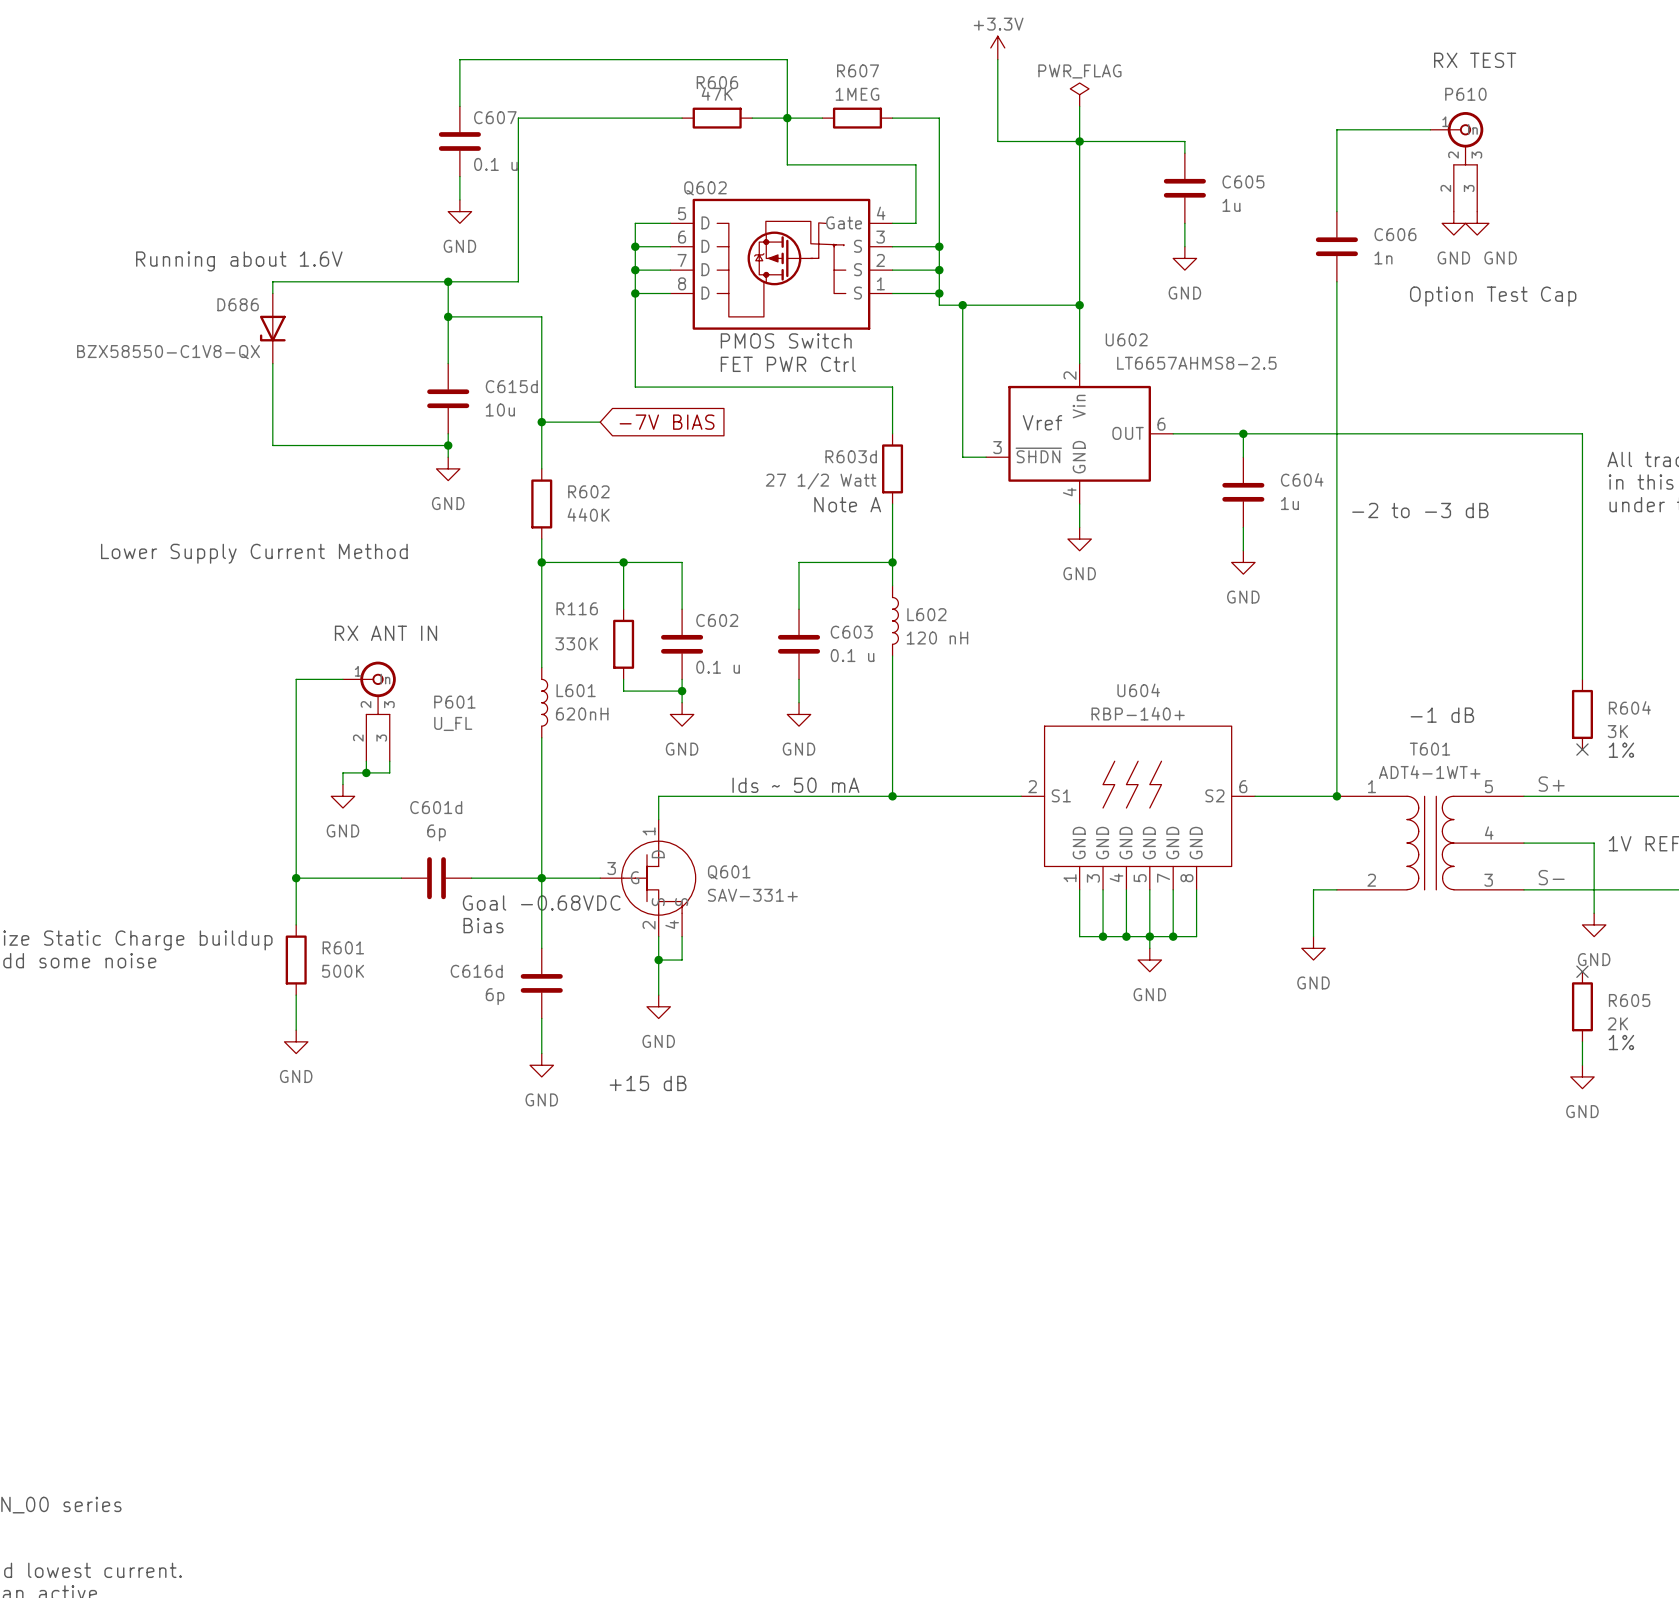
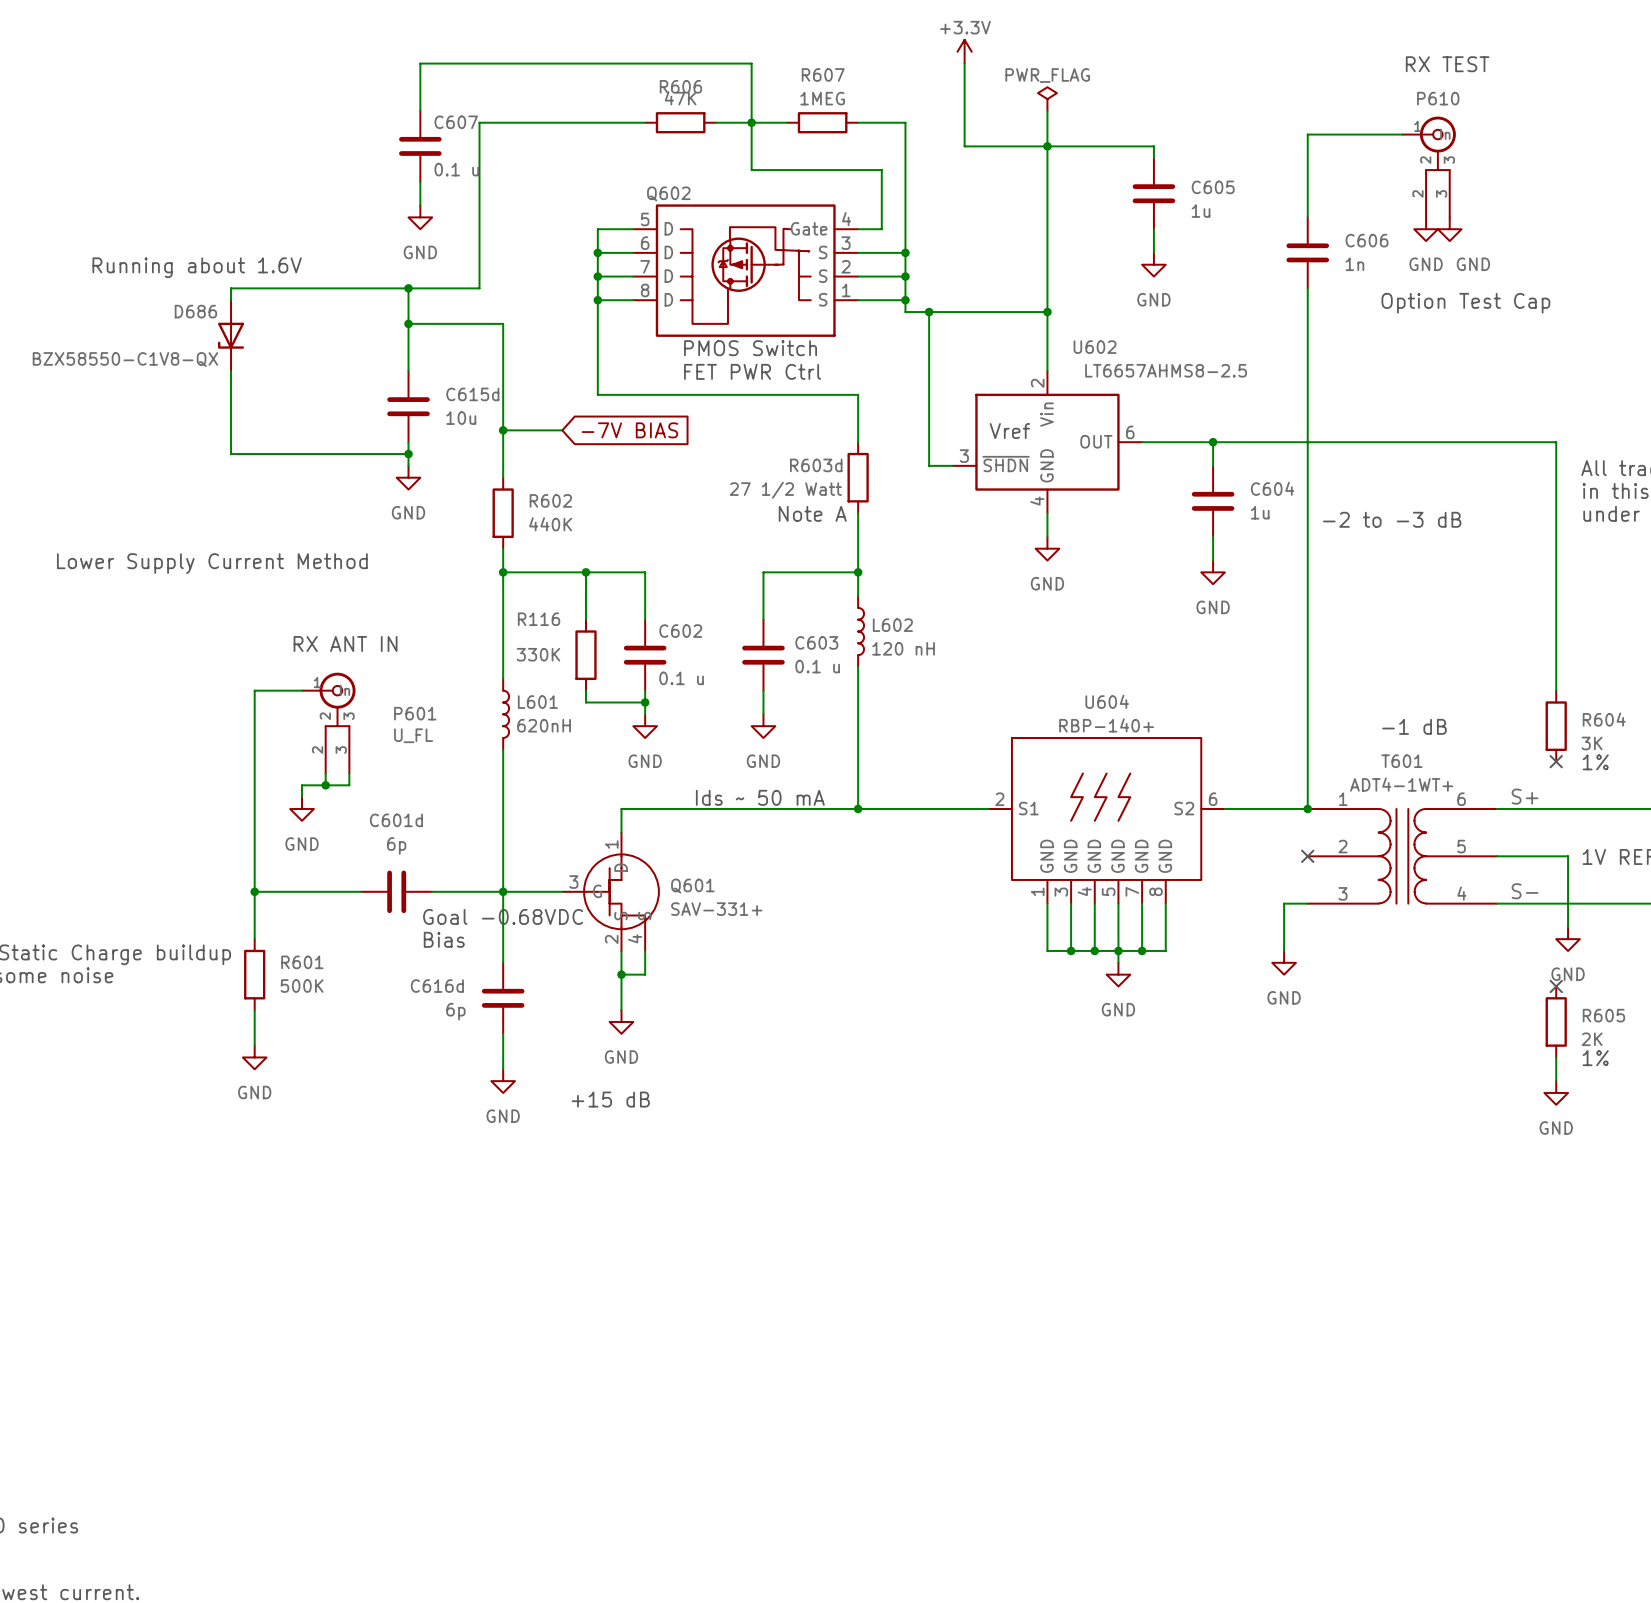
T601 symbol: [1336, 796, 1524, 890] -> [1307, 808, 1498, 904]
no-connect mark: none -> (1307, 856)

